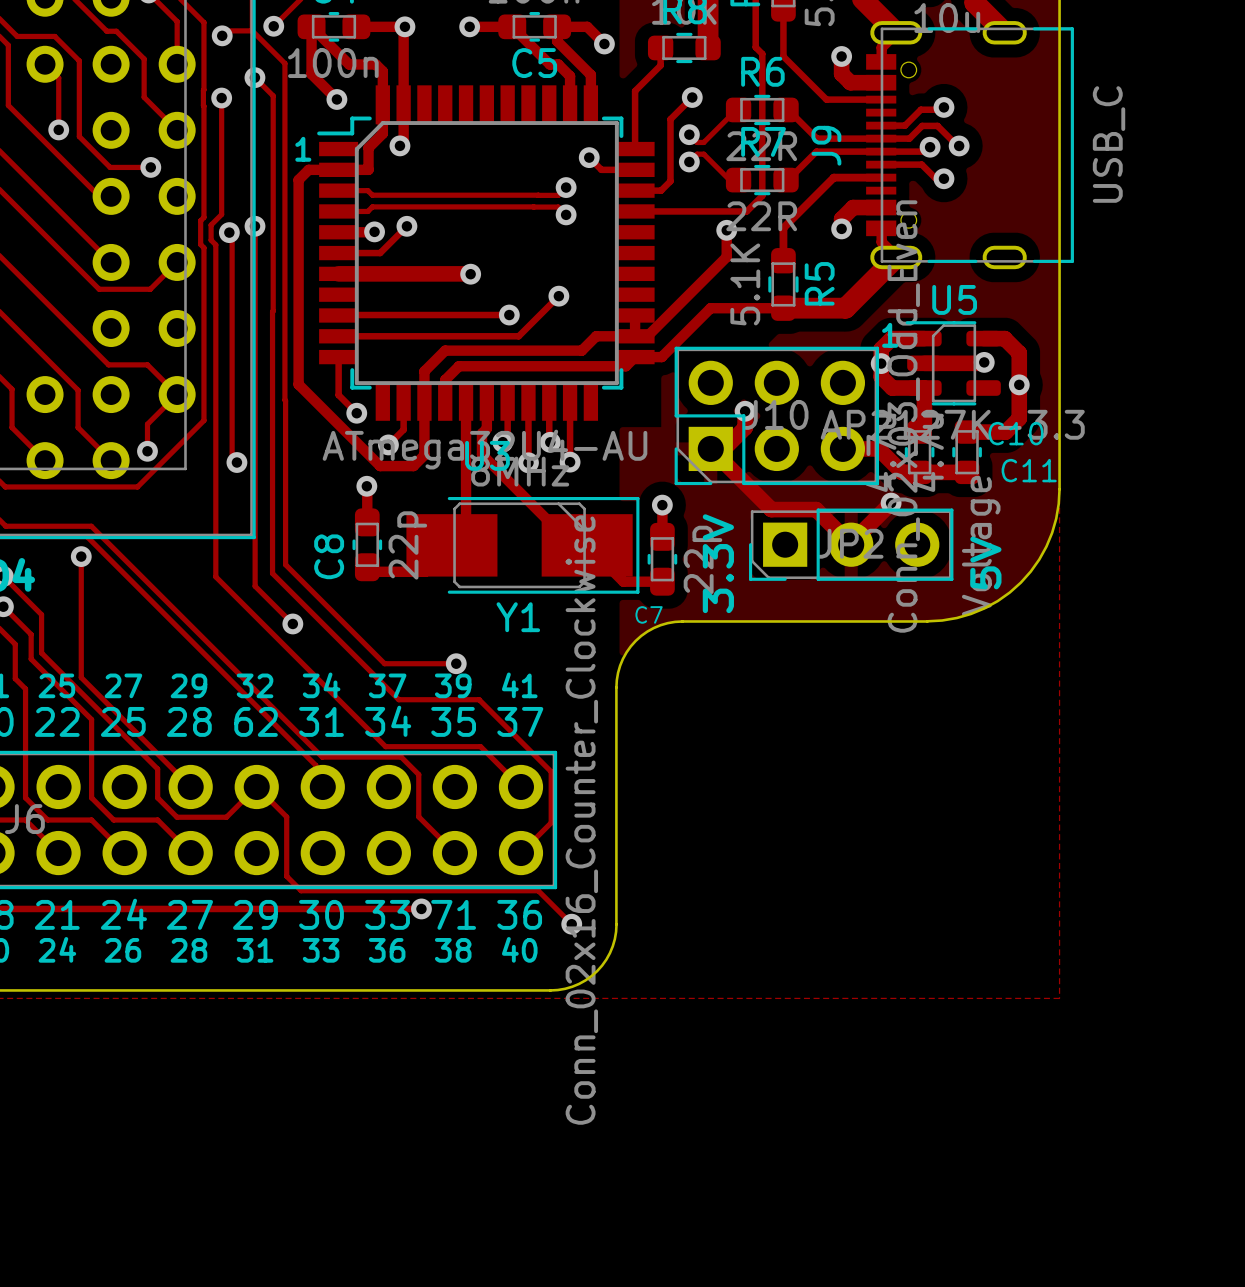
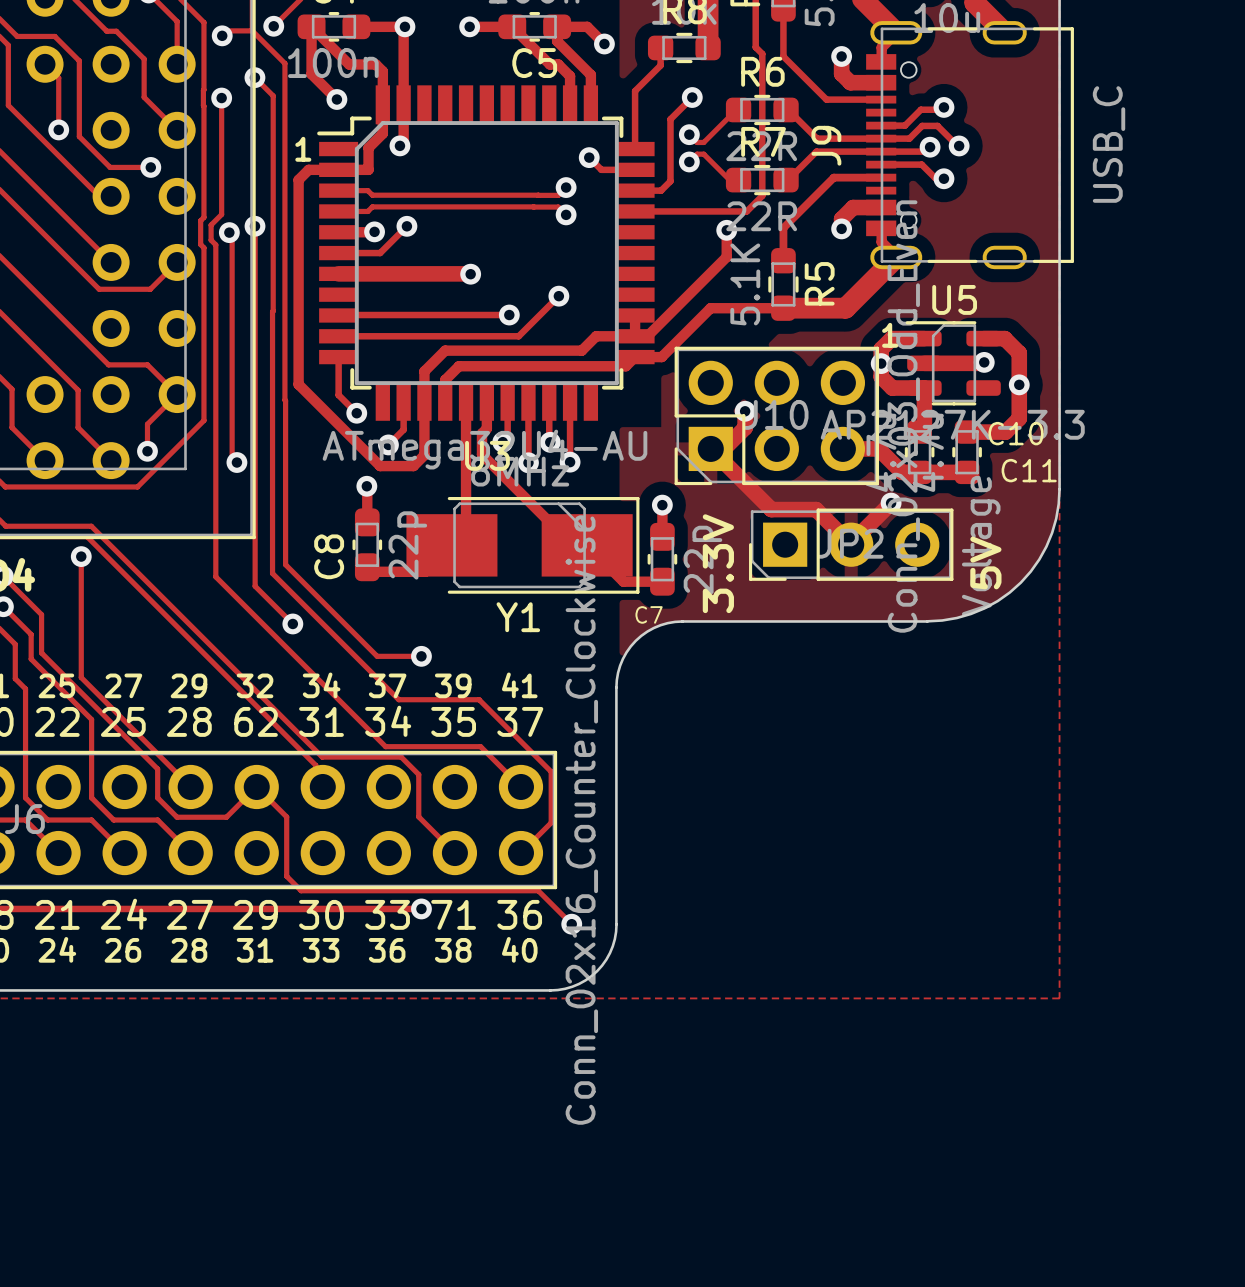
track: (377, 656) (384, 663) (456, 663) -> (377, 656) (421, 656)
via position: (456, 663) -> (421, 656)

